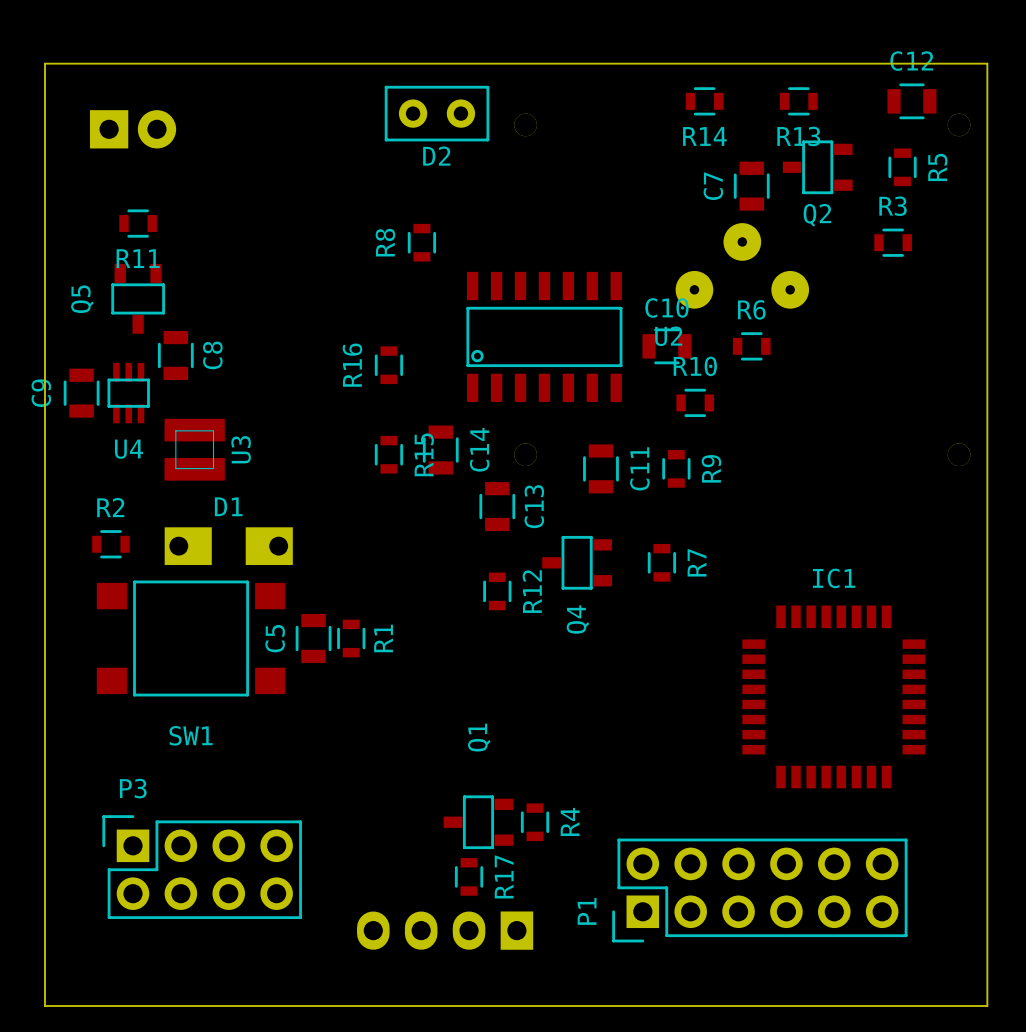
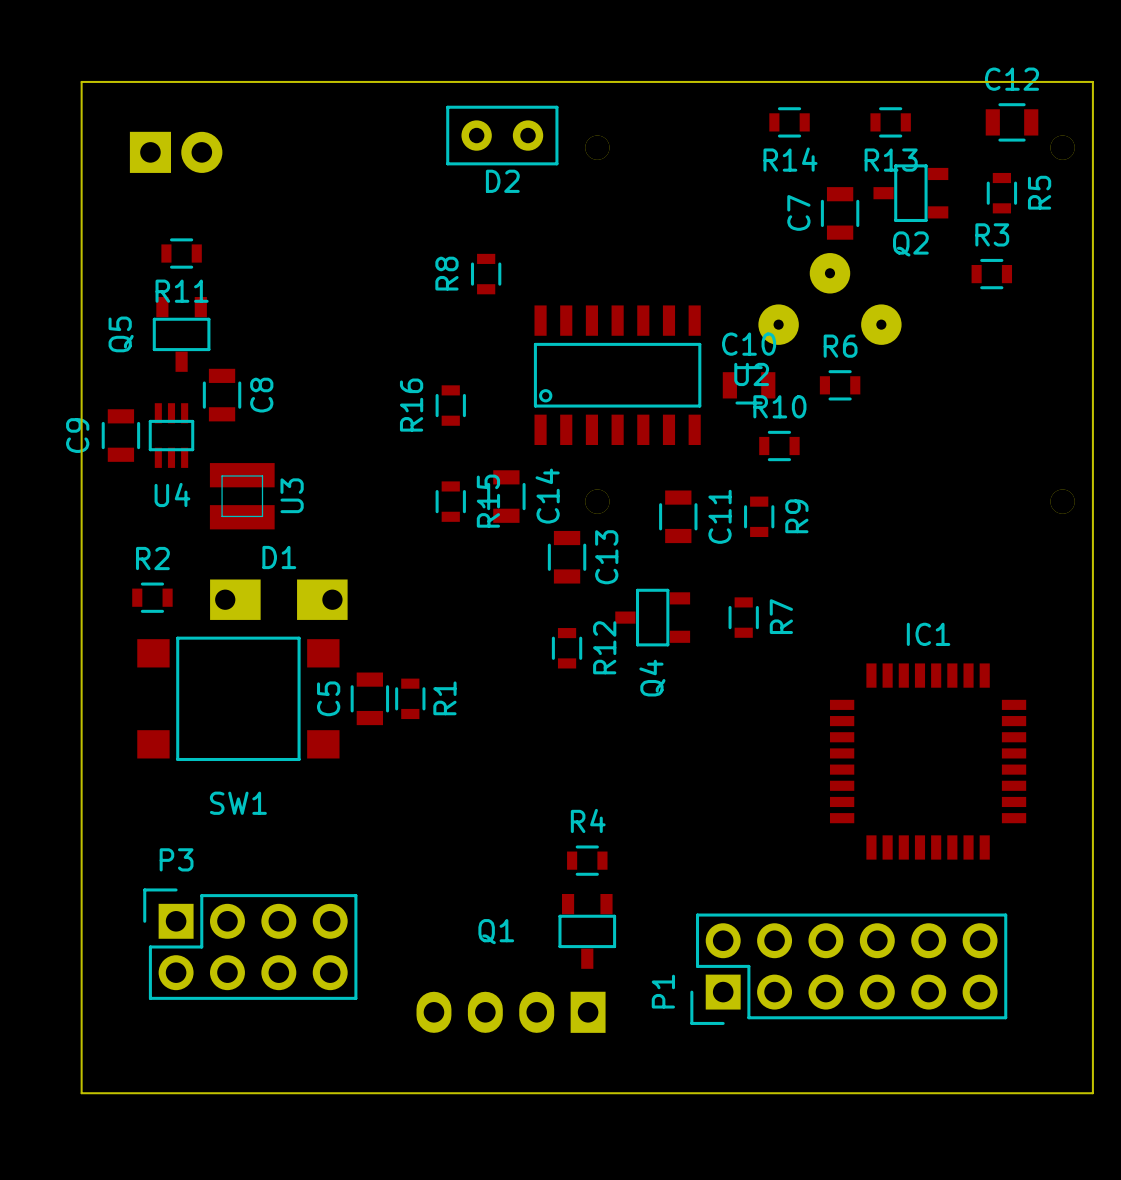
R4 name position: R4 (570, 821) -> R4 (588, 820)
Q1 rotation: 0° (478, 822) -> 90° counterclockwise (587, 931)
Q1 position: (478, 822) -> (587, 931)
R4 rotation: 0° (535, 822) -> 90° clockwise (587, 860)
R4 position: (535, 822) -> (587, 860)
R17: (469, 876) -> none

